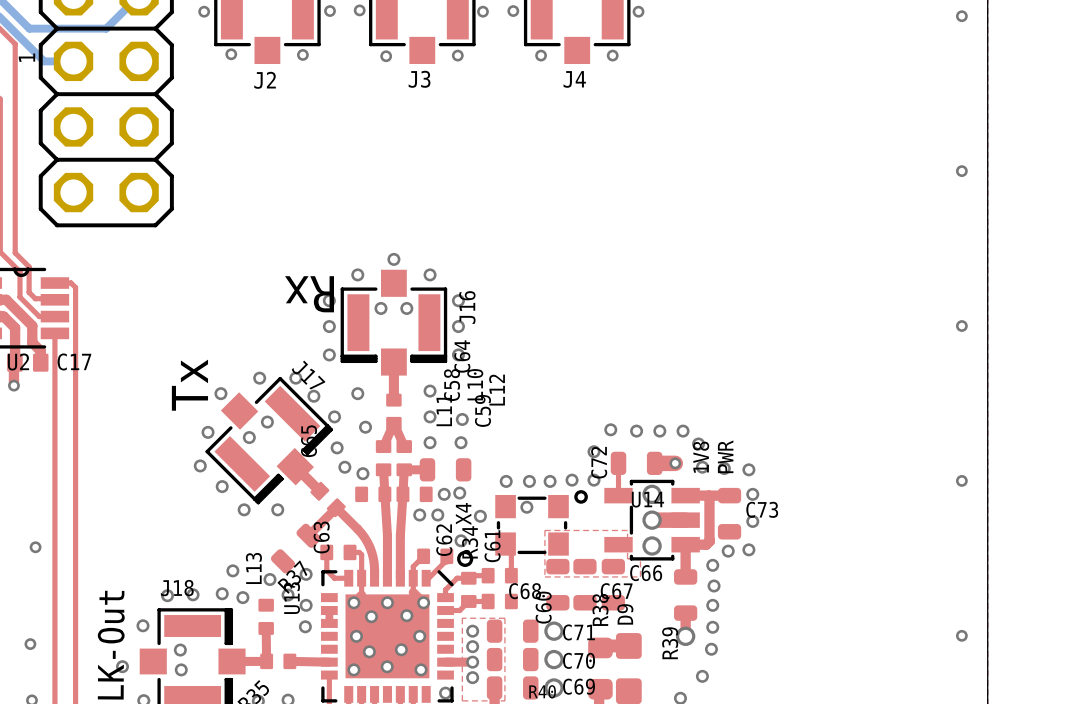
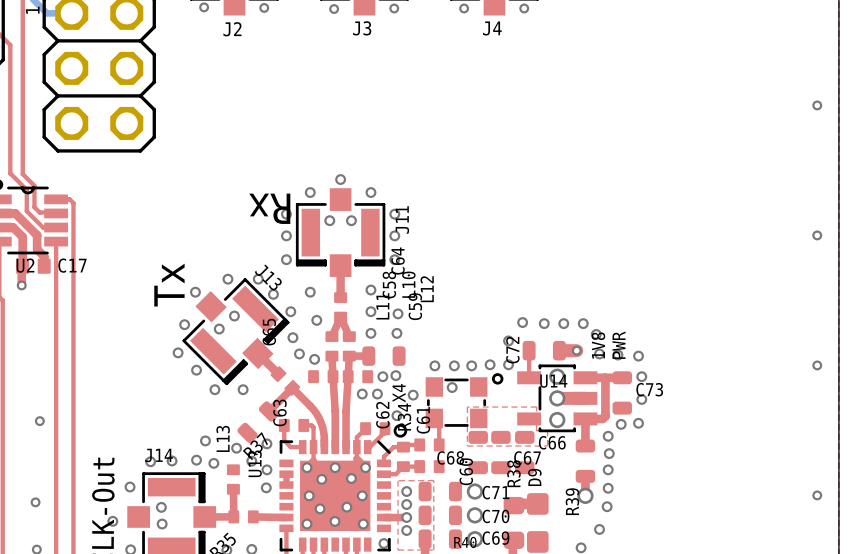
J16 name: J16 (467, 307) -> J11 (402, 219)
J17 name: J17 (308, 375) -> J13 (268, 277)
J18 name: J18 (177, 588) -> J14 (158, 455)

